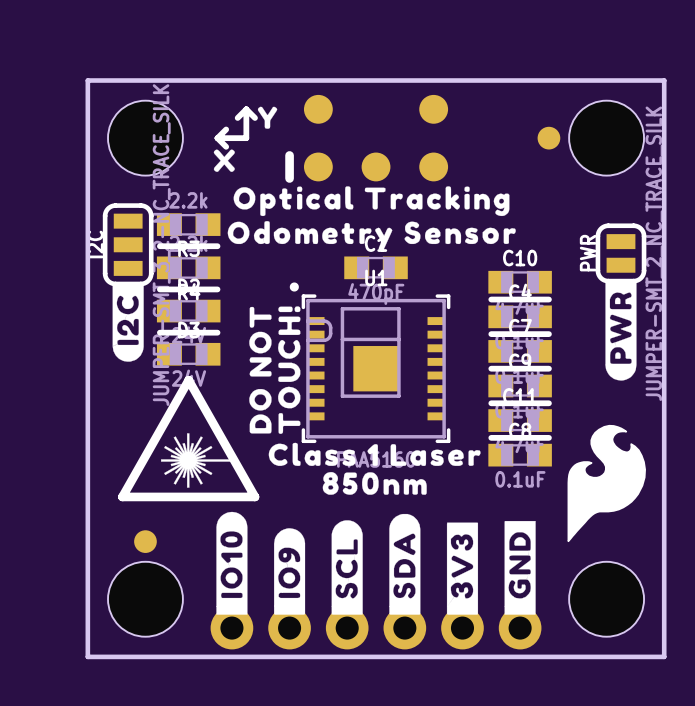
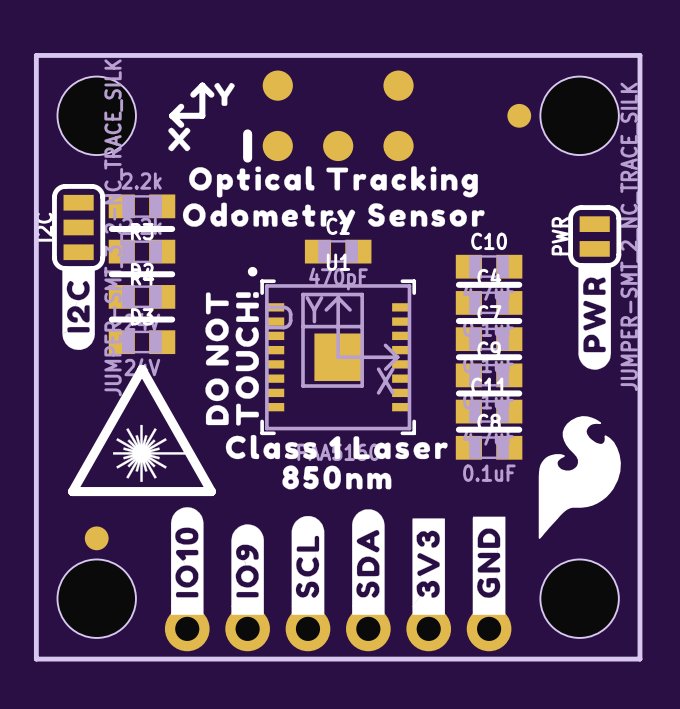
U1 footprint: [289, 282, 451, 444] -> [247, 266, 417, 436]

